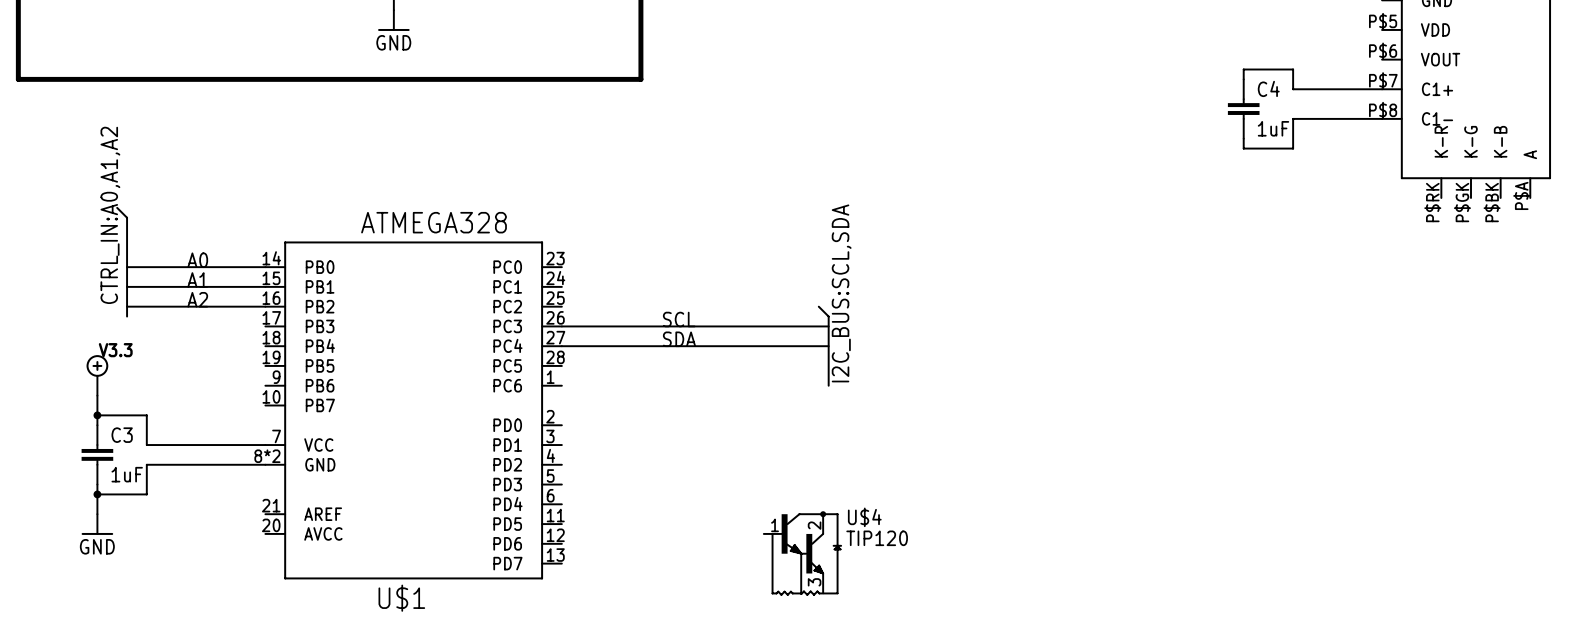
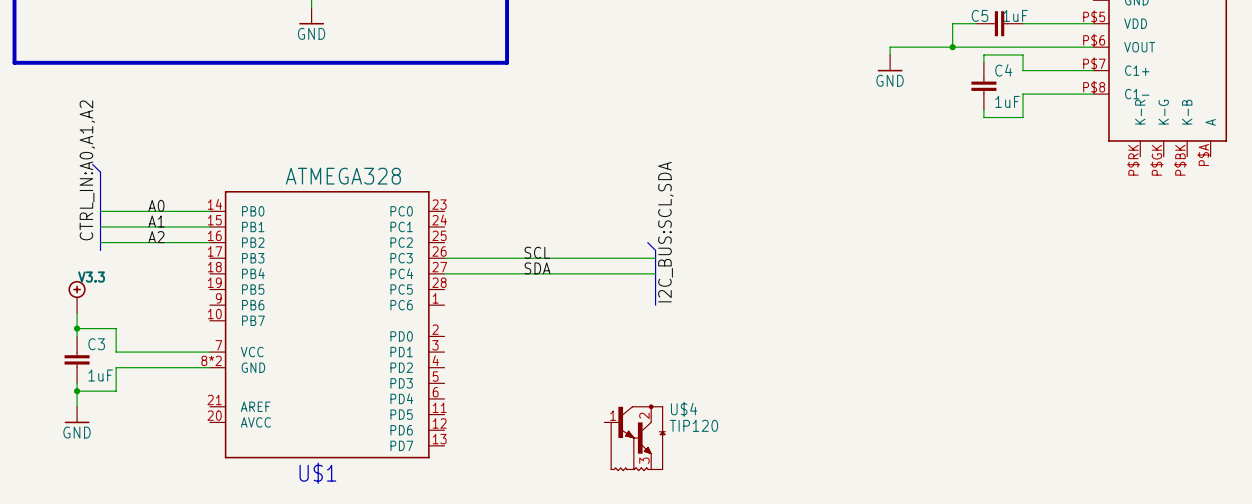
wire: none -> (976, 23) (952, 23) (952, 47)
C5: none -> 1uF (999, 23)
wire: none -> (1023, 23) (1093, 23)
junction: none -> (952, 47)
wire: none -> (1093, 47) (890, 47) (890, 54)
power symbol: none -> GND (890, 63)

